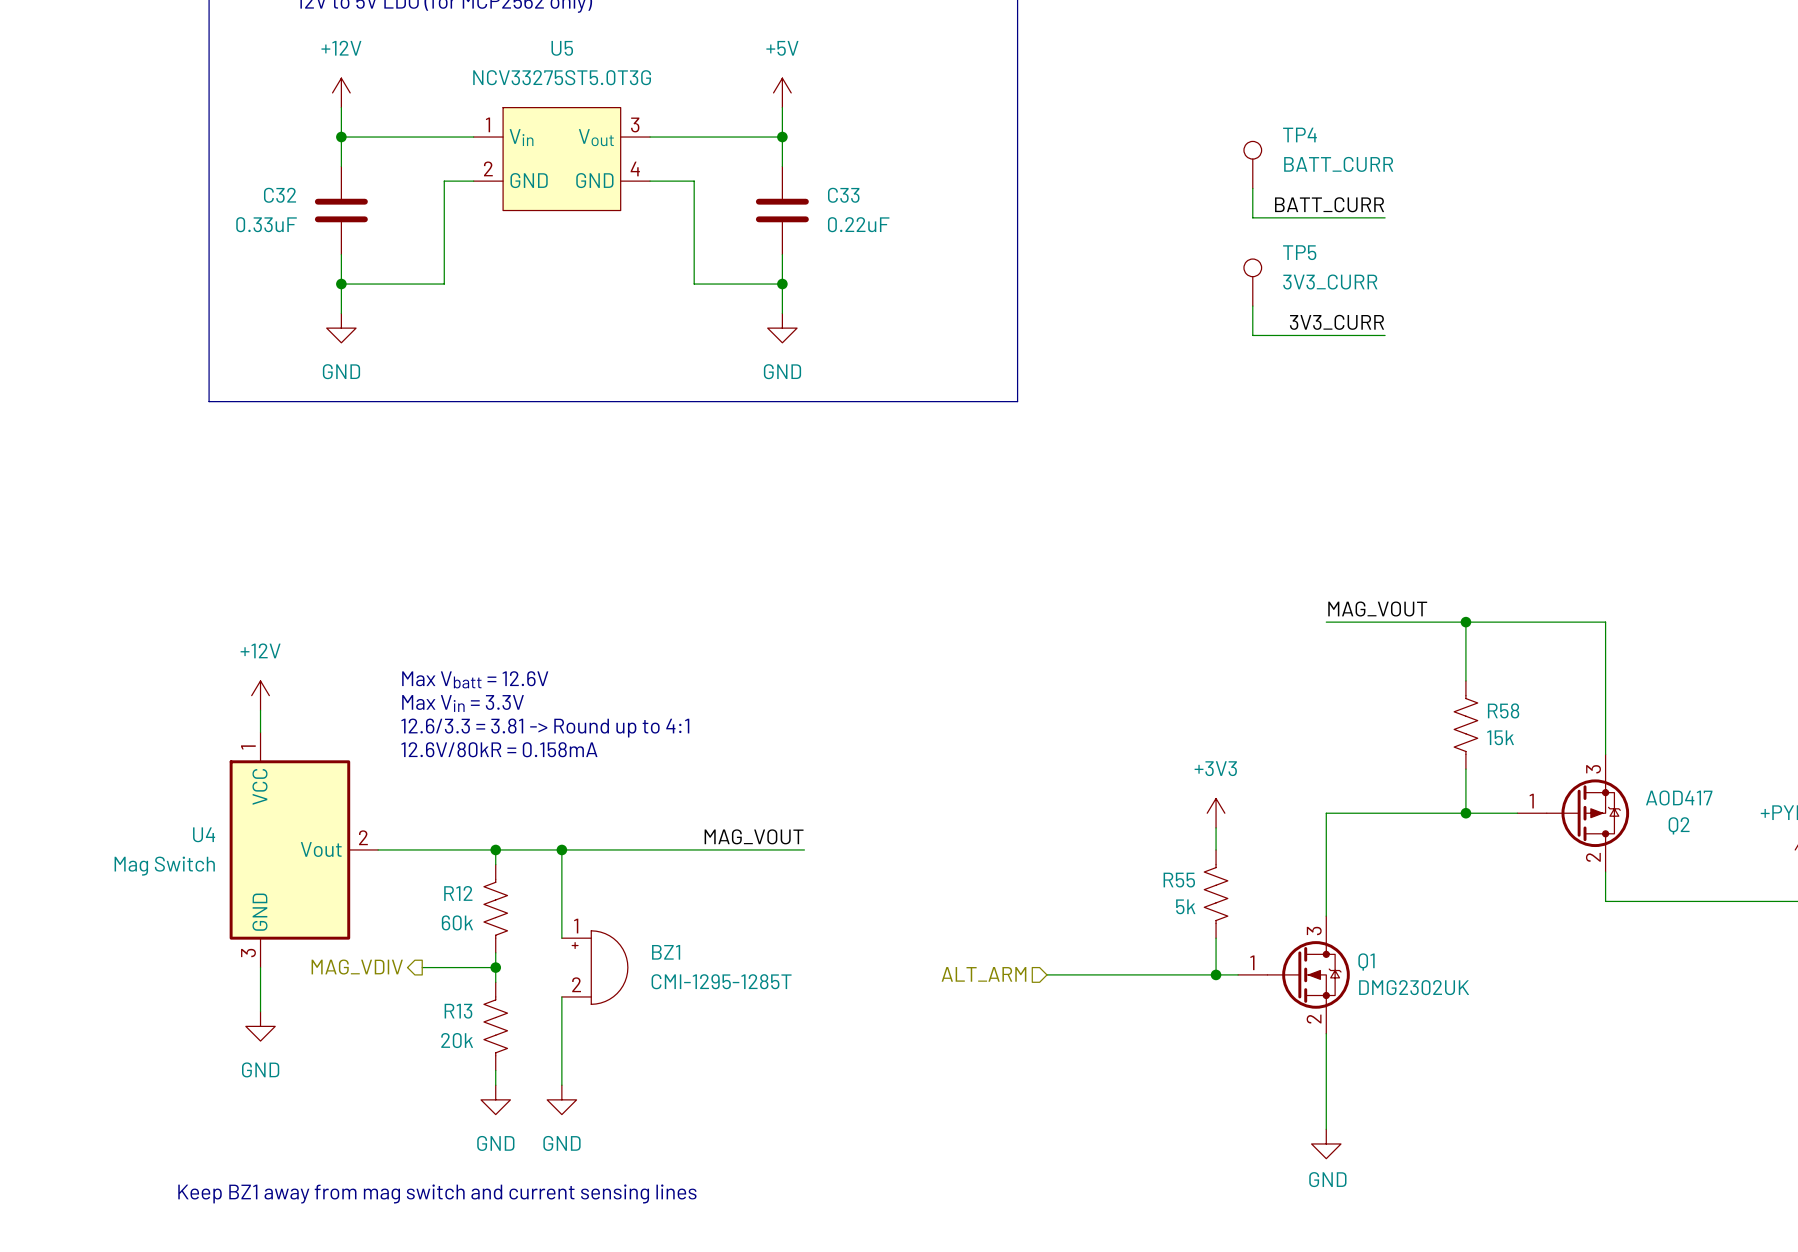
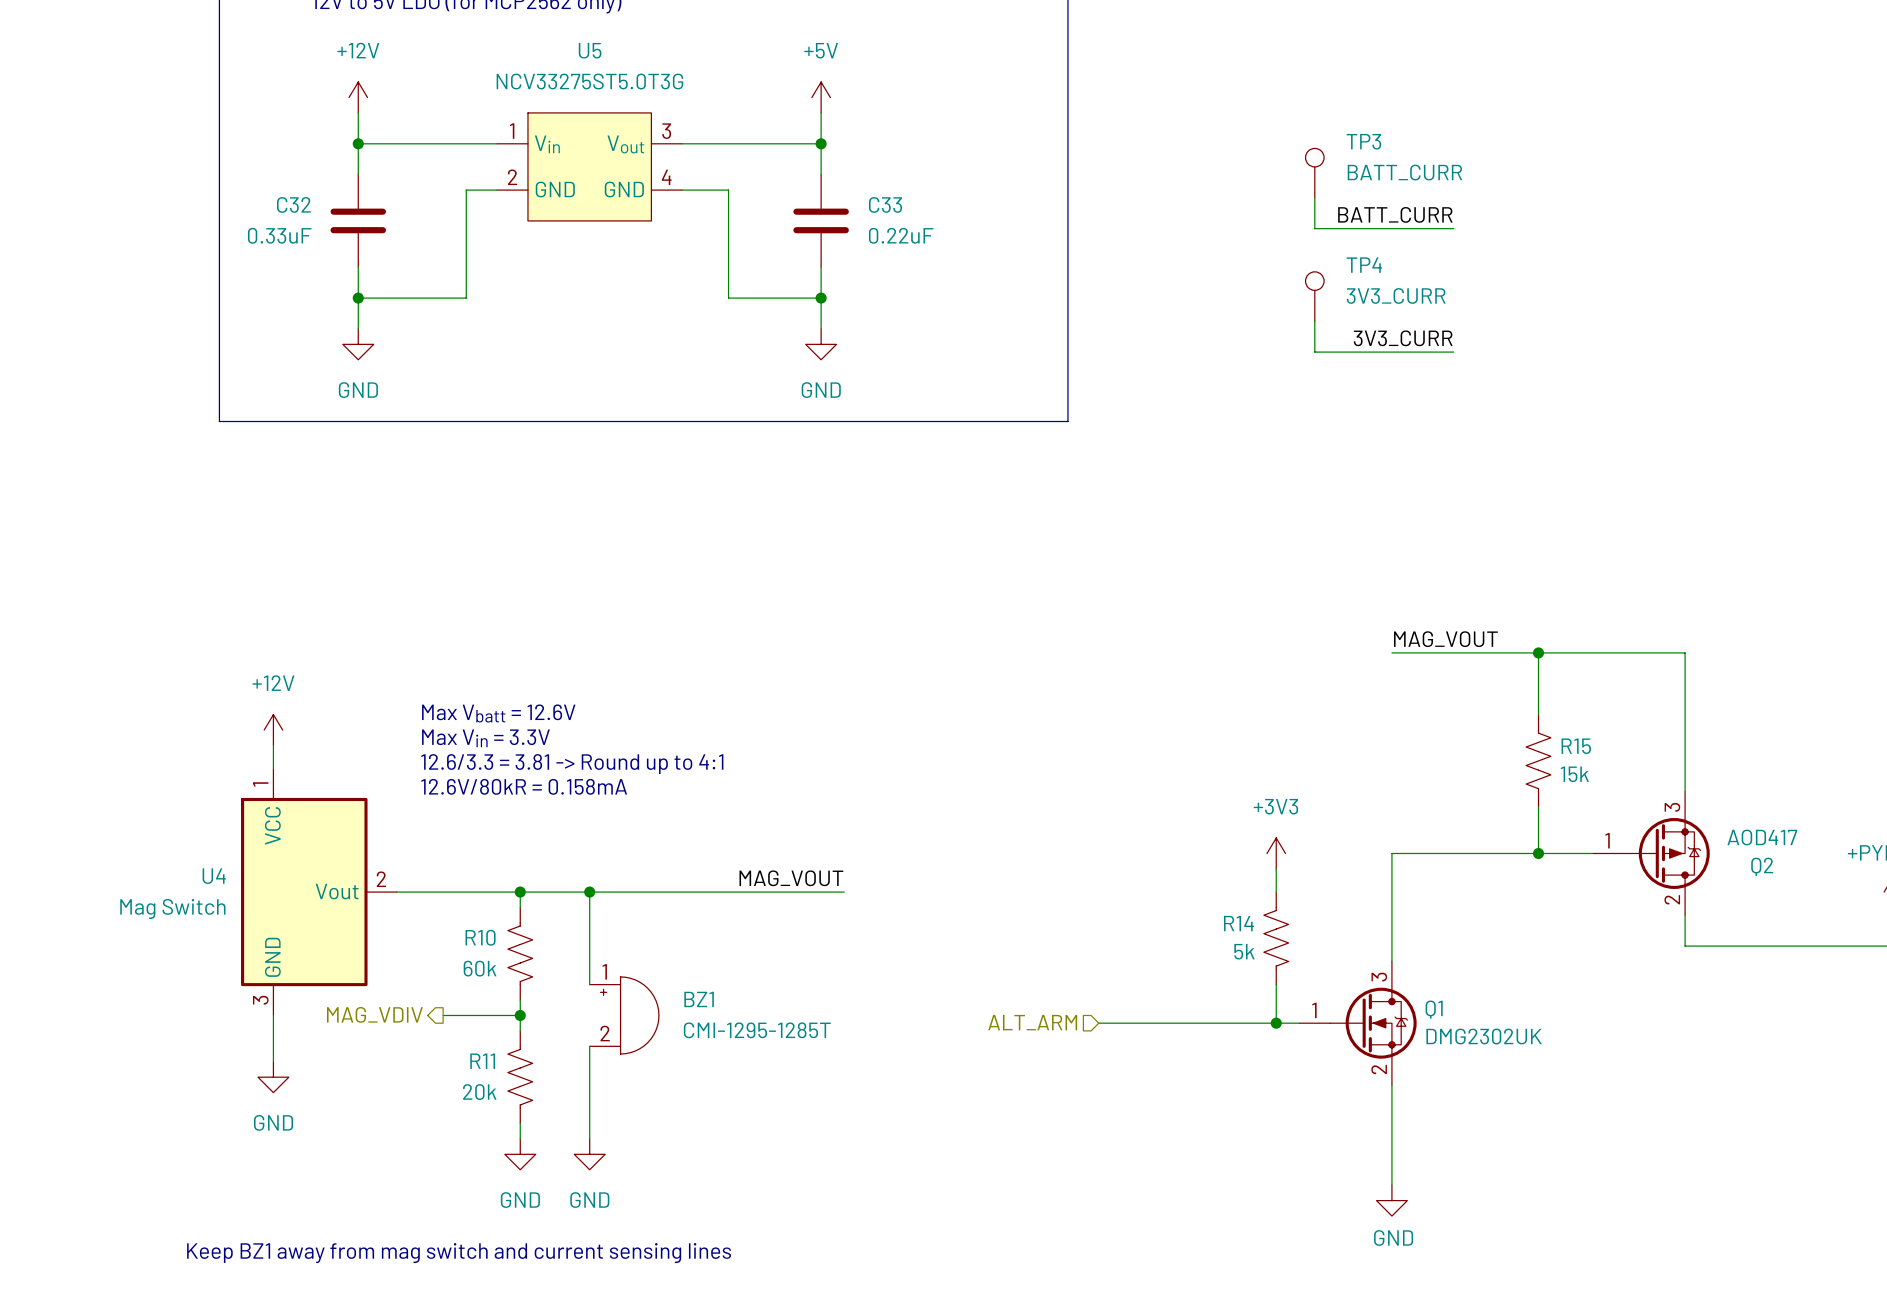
TP4 name: TP4 (1299, 134) -> TP3 (1363, 141)
TP5 name: TP5 (1299, 252) -> TP4 (1364, 265)
R58 name: R58 (1503, 710) -> R15 (1576, 746)
R55 name: R55 (1179, 880) -> R14 (1238, 923)
R12 name: R12 (458, 893) -> R10 (480, 937)
R13 name: R13 (458, 1011) -> R11 (482, 1061)

